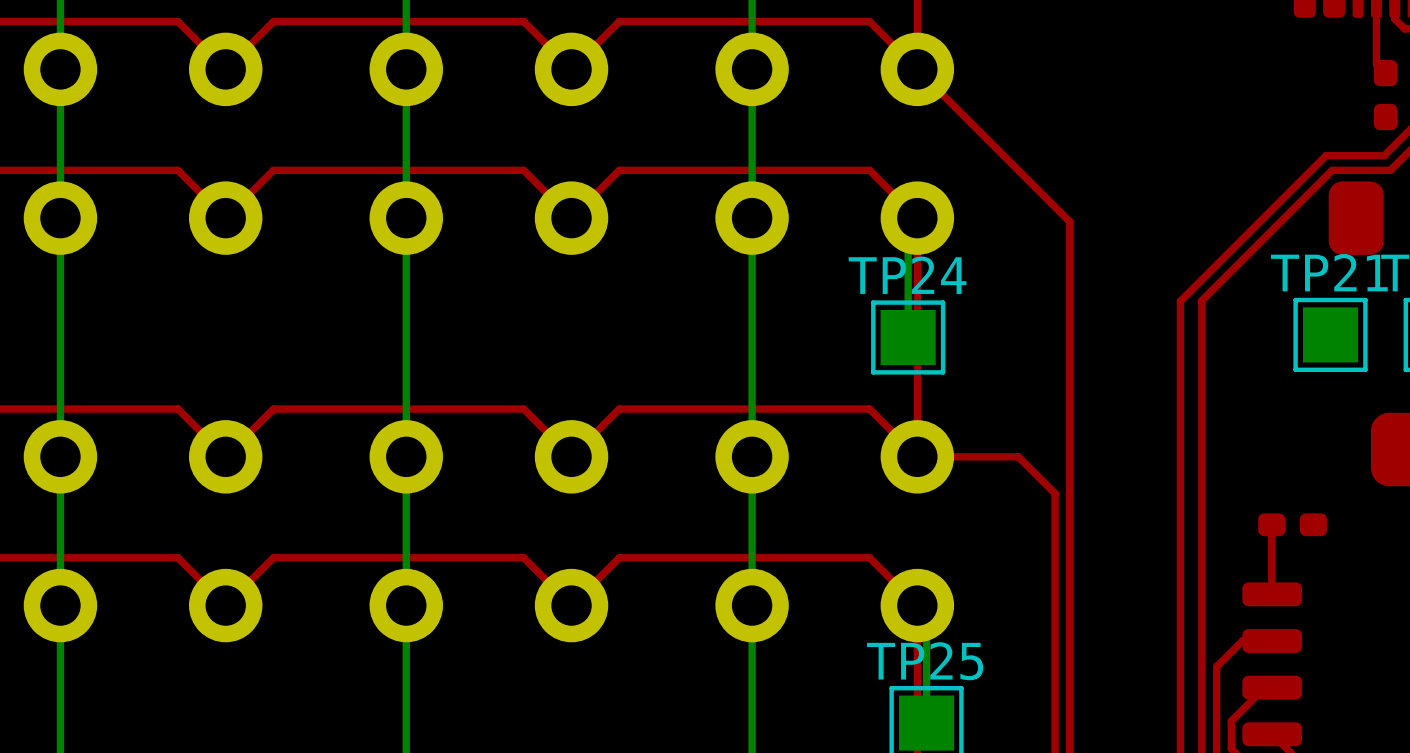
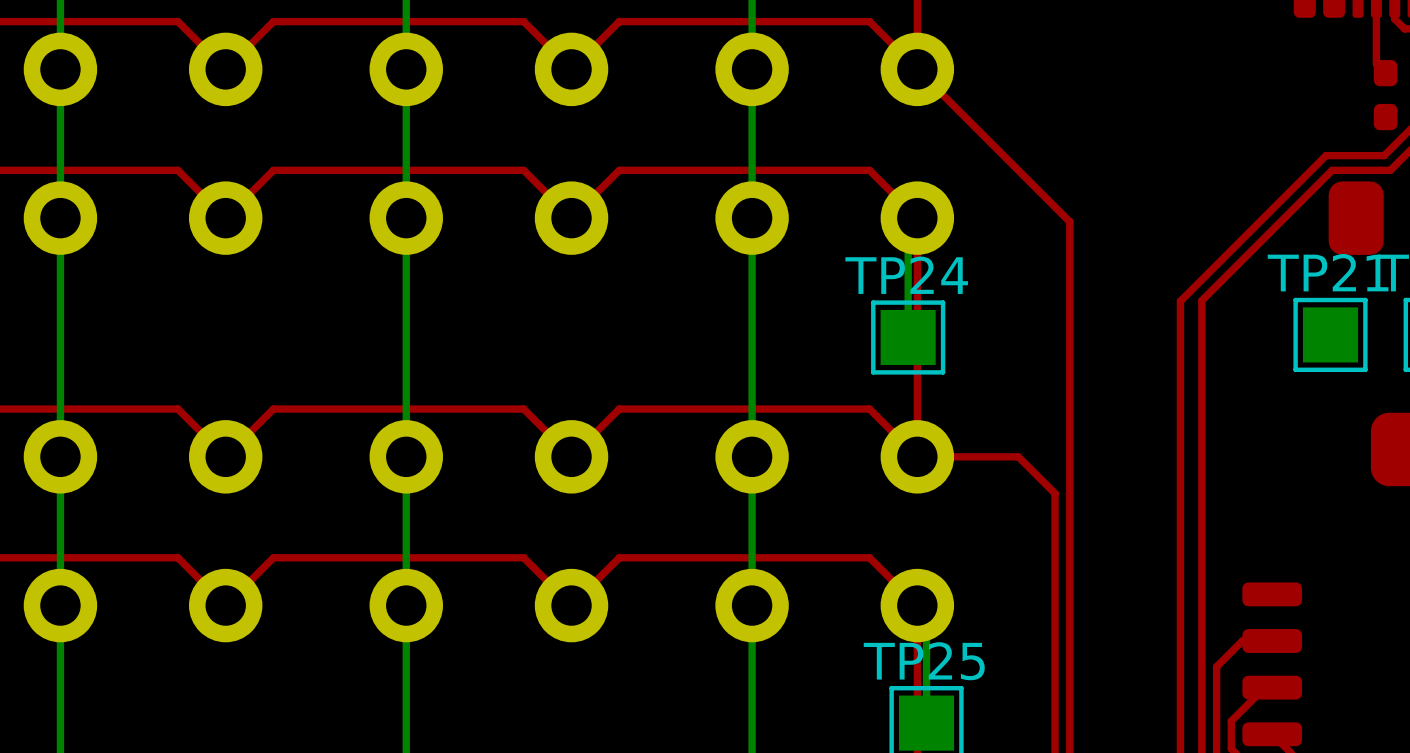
top track: (1271, 524) (1271, 593) -> none
part: (1292, 524) -> none

